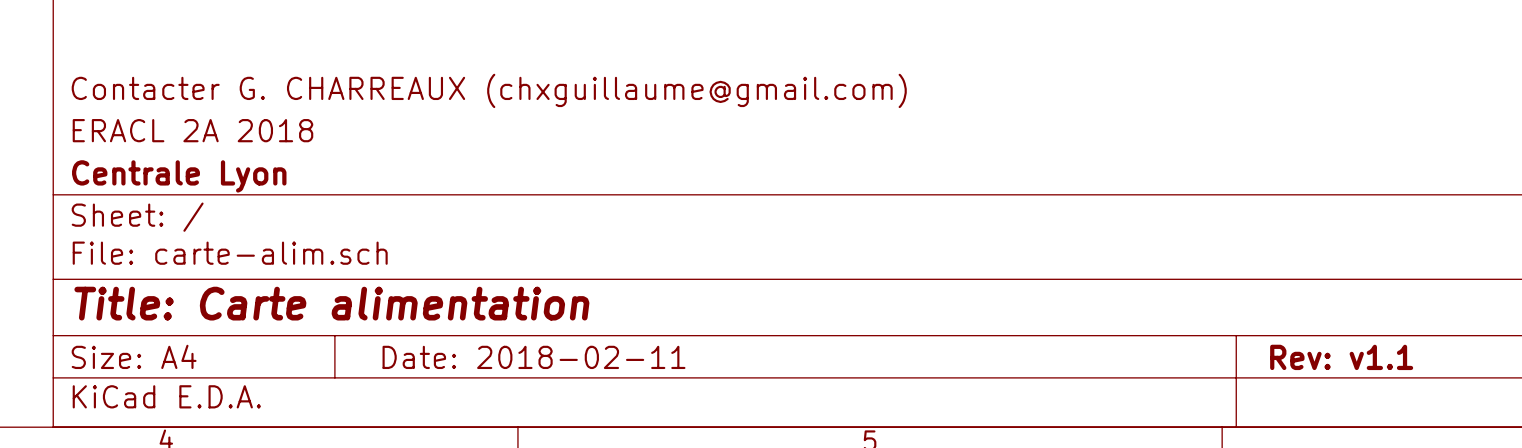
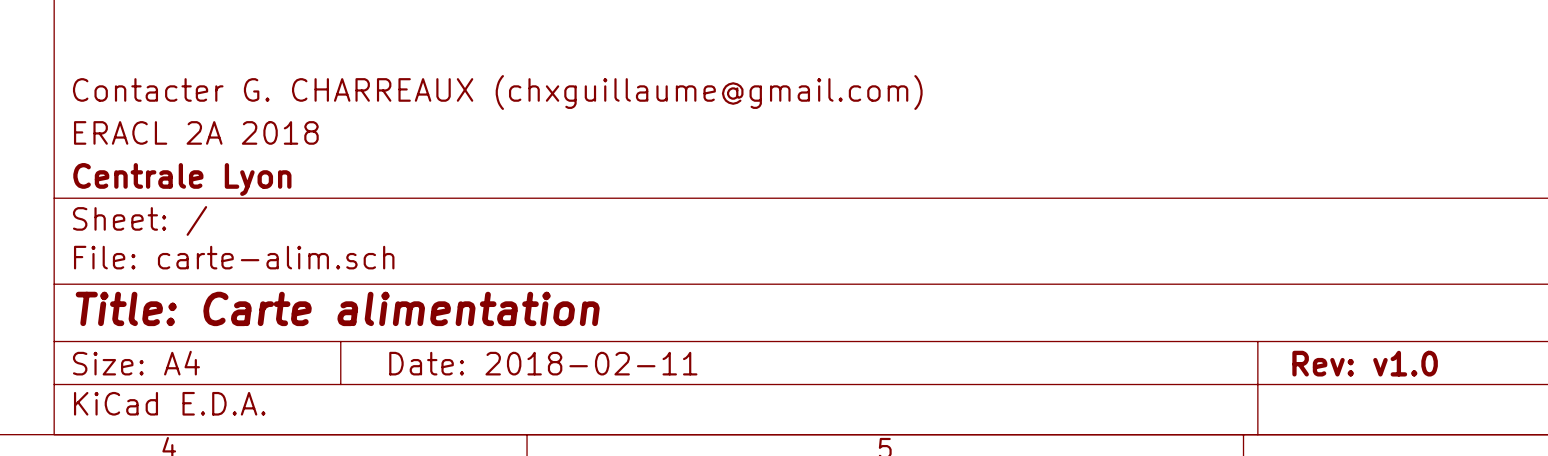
title block: Rev: v1.1 (1341, 357) -> Rev: v1.0 (1365, 363)

